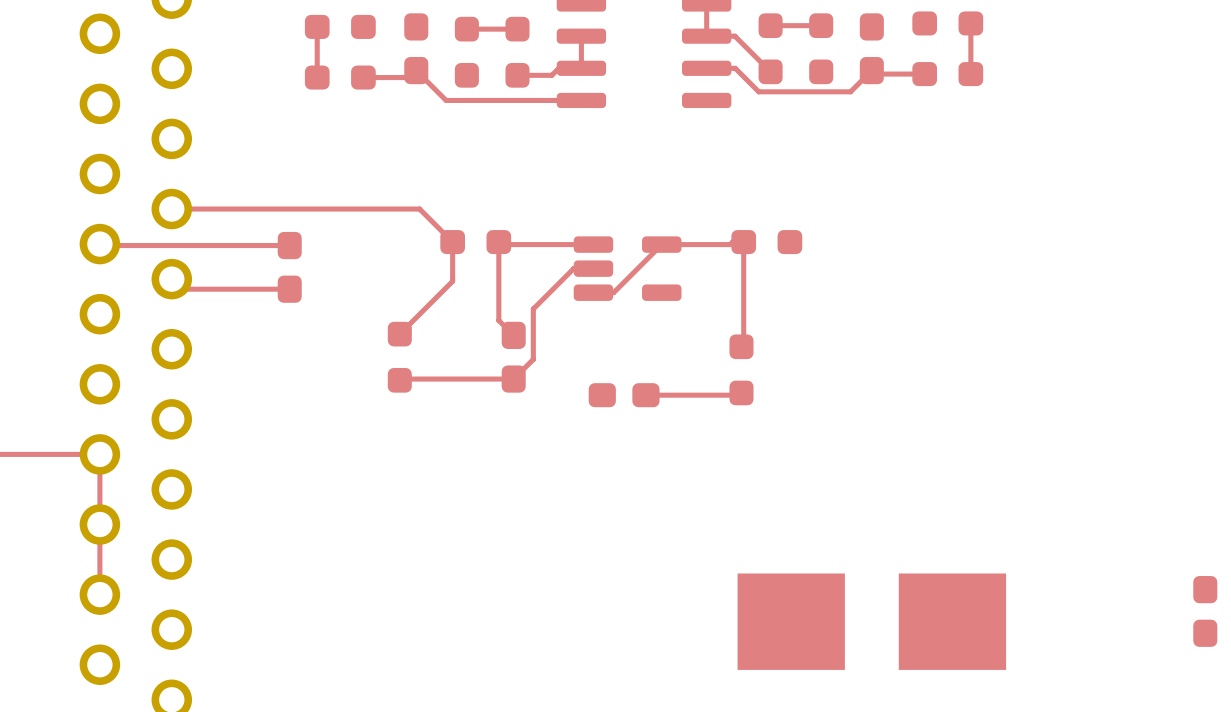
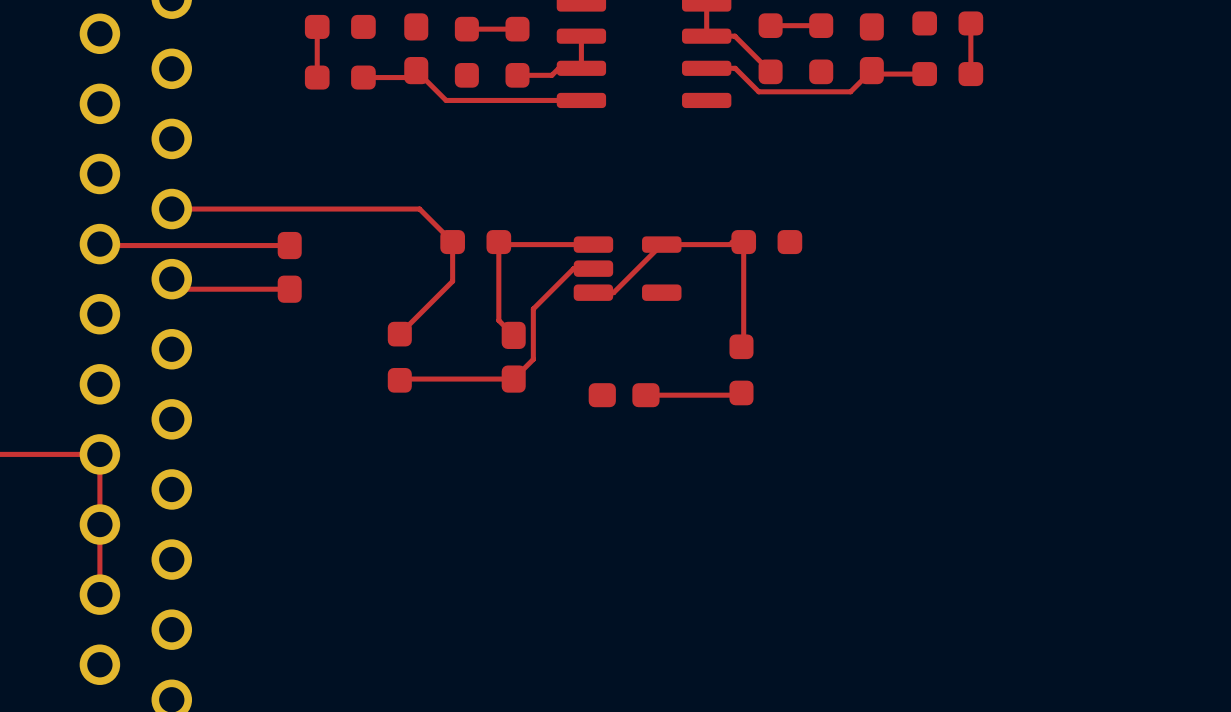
part: (1205, 611) -> none
part: (871, 621) -> none

